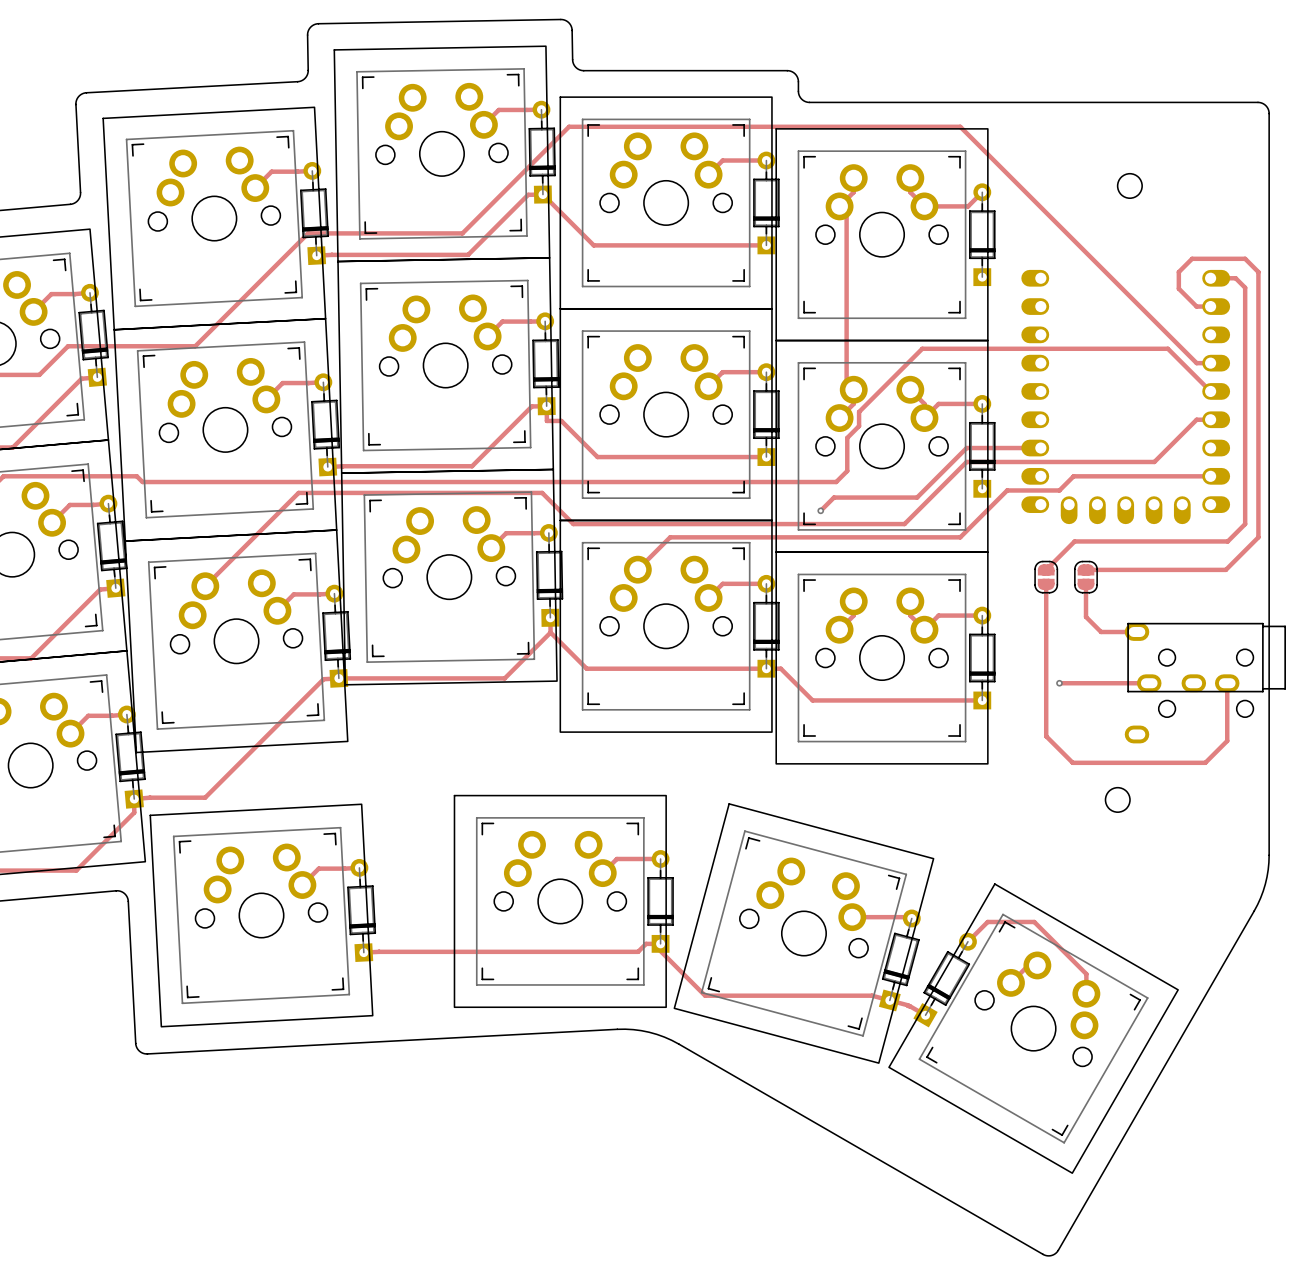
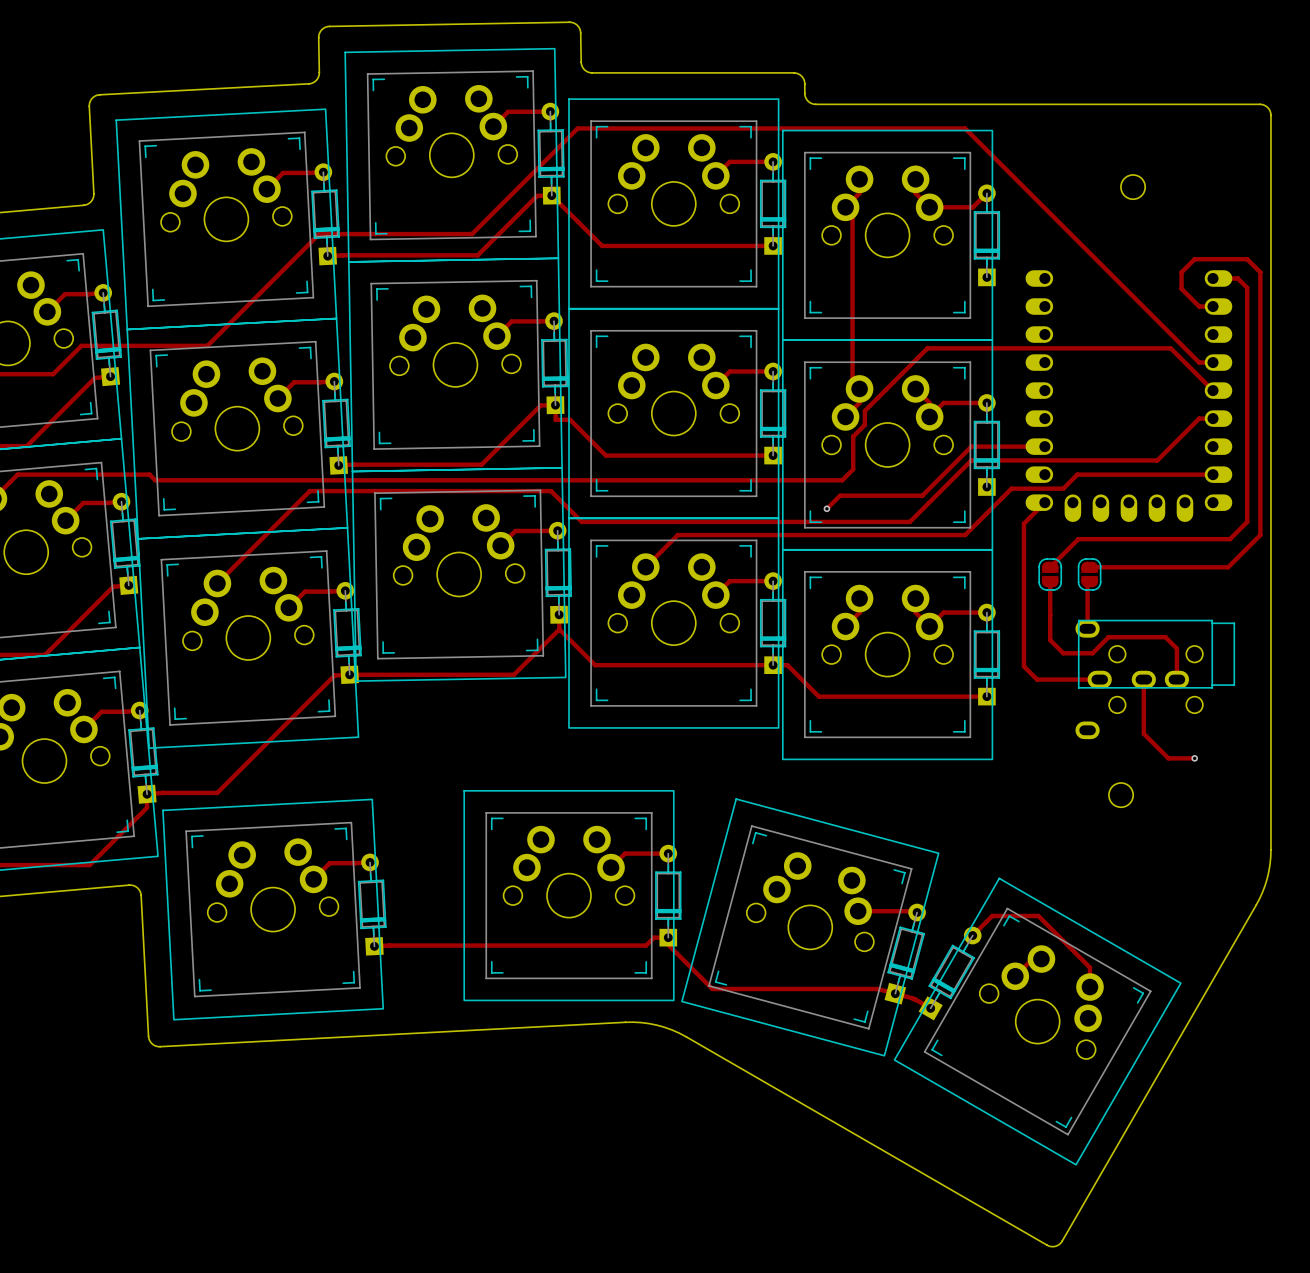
track: none -> (1044, 502) (1023, 523) (1023, 666) (1037, 679) (1063, 679)
track: (1086, 584) (1086, 616) (1101, 632) (1137, 632) -> none
track: none -> (1087, 583) (1087, 628)
track: (1046, 643) (1046, 736) (1072, 762) (1165, 762) -> (1050, 640) (1063, 653) (1092, 653) (1108, 637) (1165, 637) (1176, 648) (1176, 679)
via: (1059, 683) -> none
track: (1096, 683) (1149, 683) -> none
track: none -> (1143, 679) (1143, 733) (1168, 758)
part position: (1205, 683) -> (1155, 679)
track: (1227, 683) (1227, 740) (1205, 762) (1192, 762) -> none
via: none -> (1194, 758)

